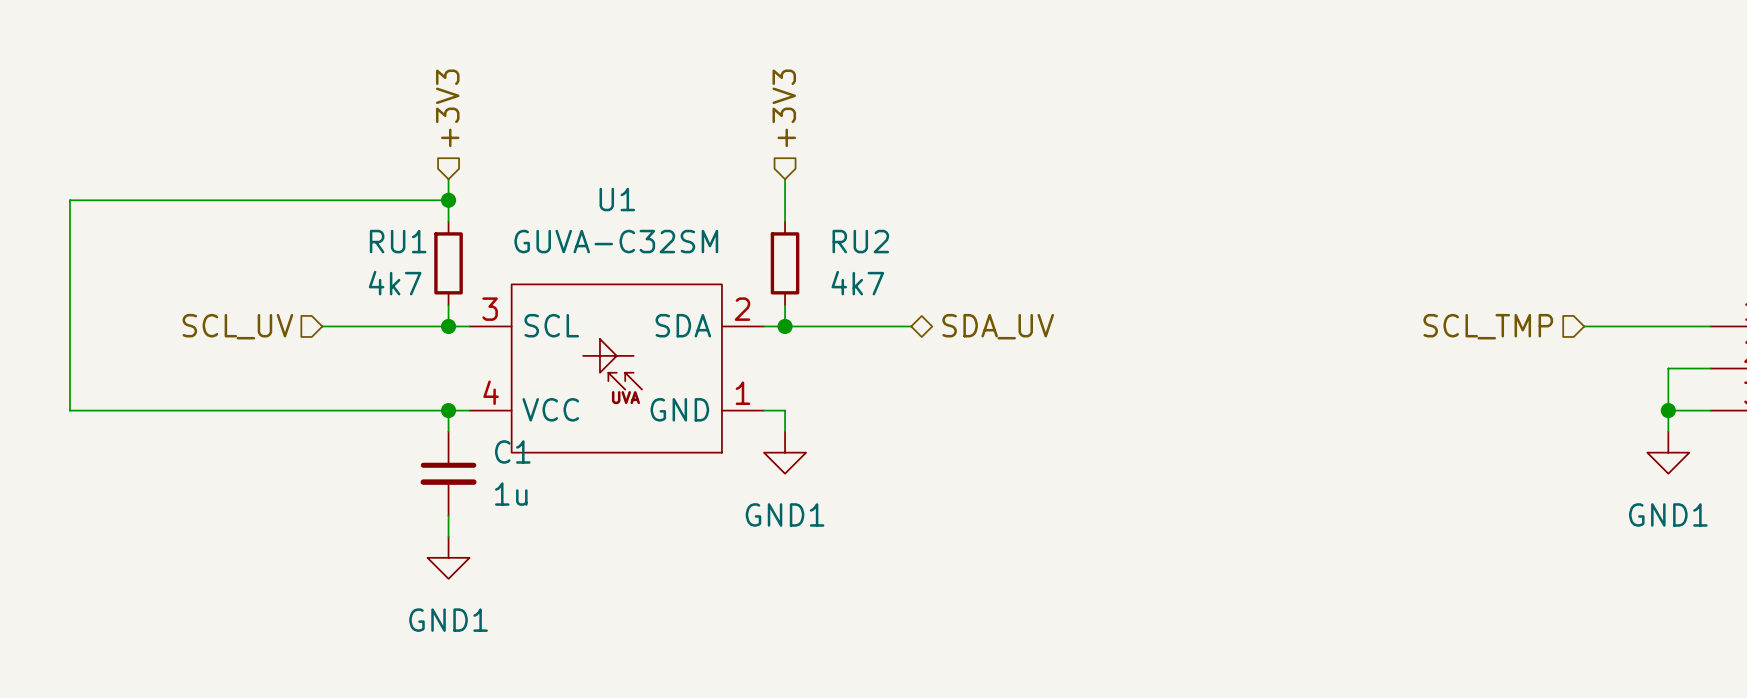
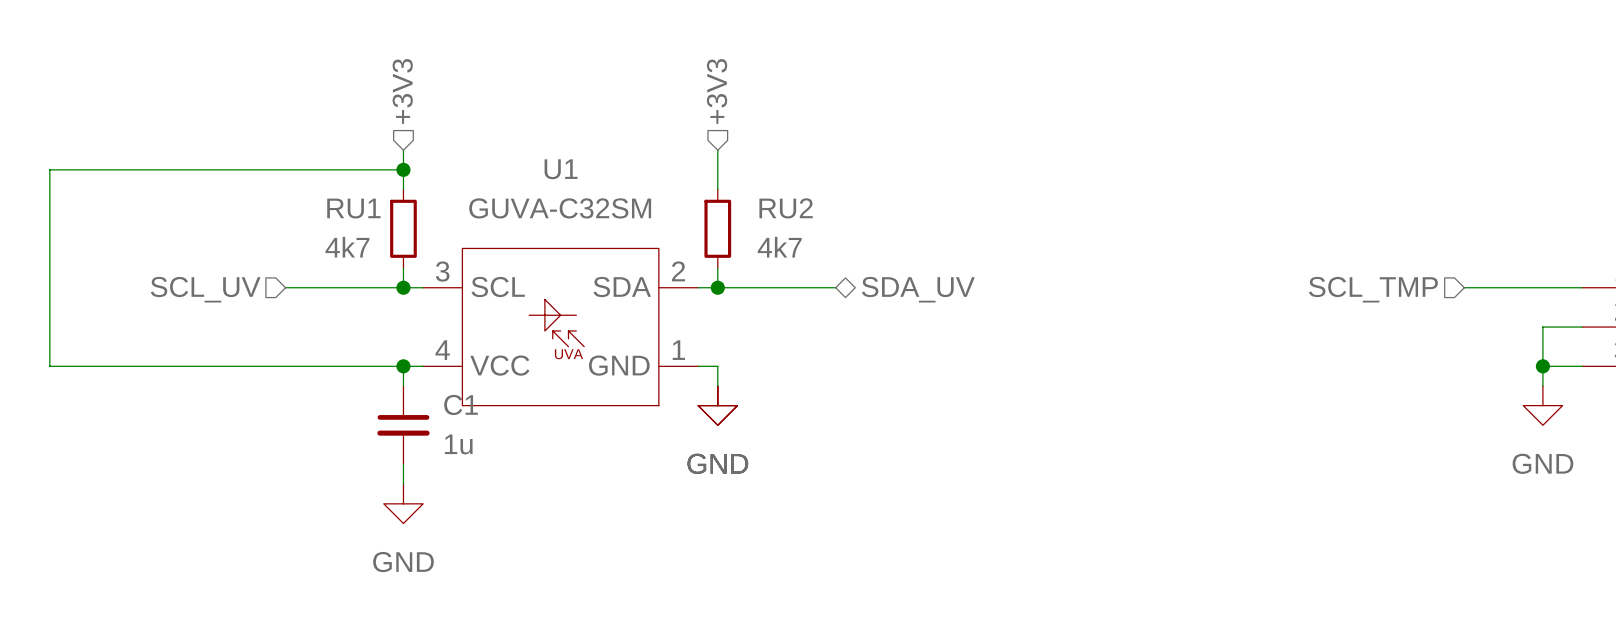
power symbol: GND1 (785, 452) -> GND (717, 405)
power symbol: GND1 (1668, 452) -> GND (1542, 405)
power symbol: GND1 (448, 557) -> GND (403, 503)

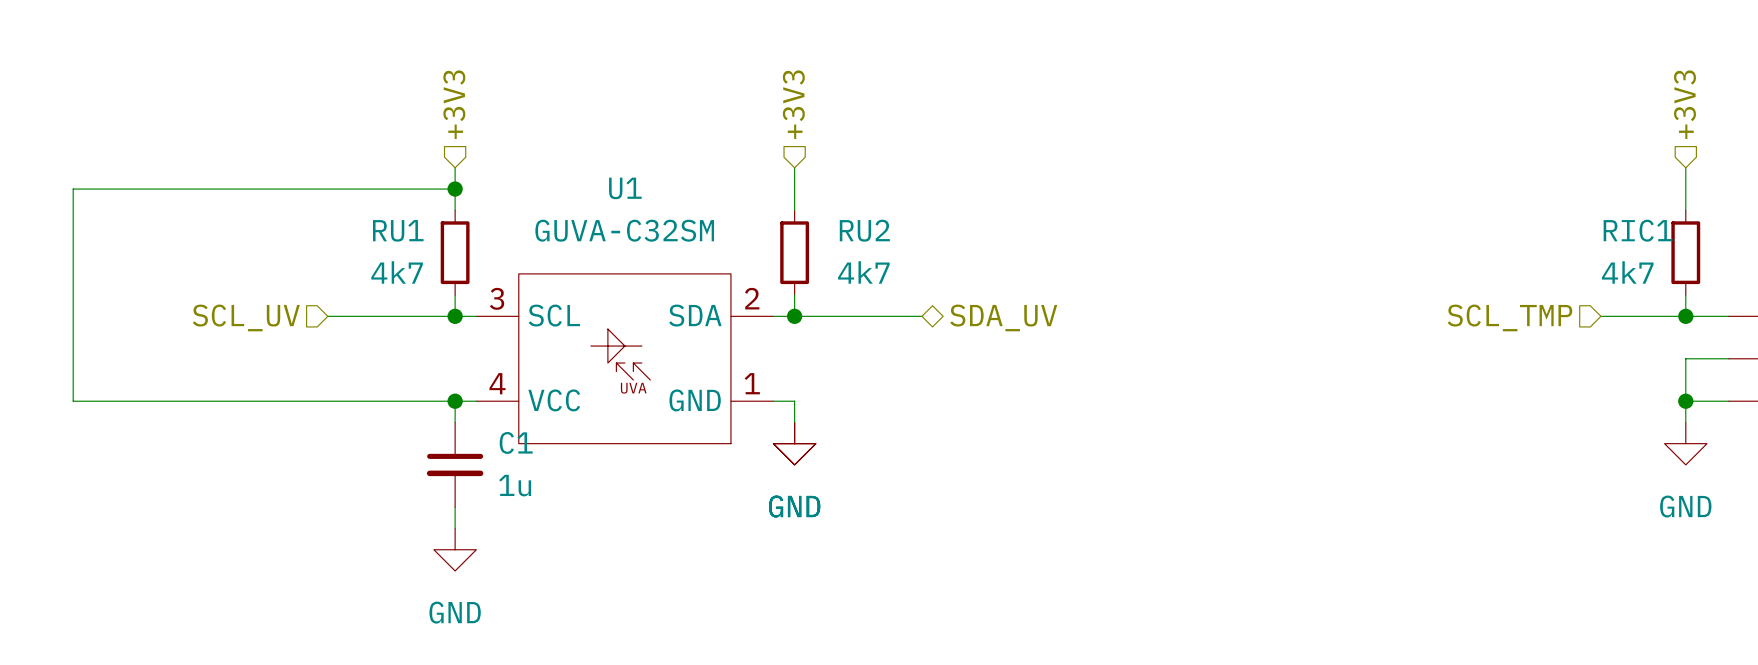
hierarchical label: none -> +3V3 (1684, 104)
wire: none -> (1685, 167) (1685, 210)
RIC1: none -> 4k7 (1685, 252)
wire: none -> (1685, 295) (1685, 316)
junction: none -> (1685, 316)

